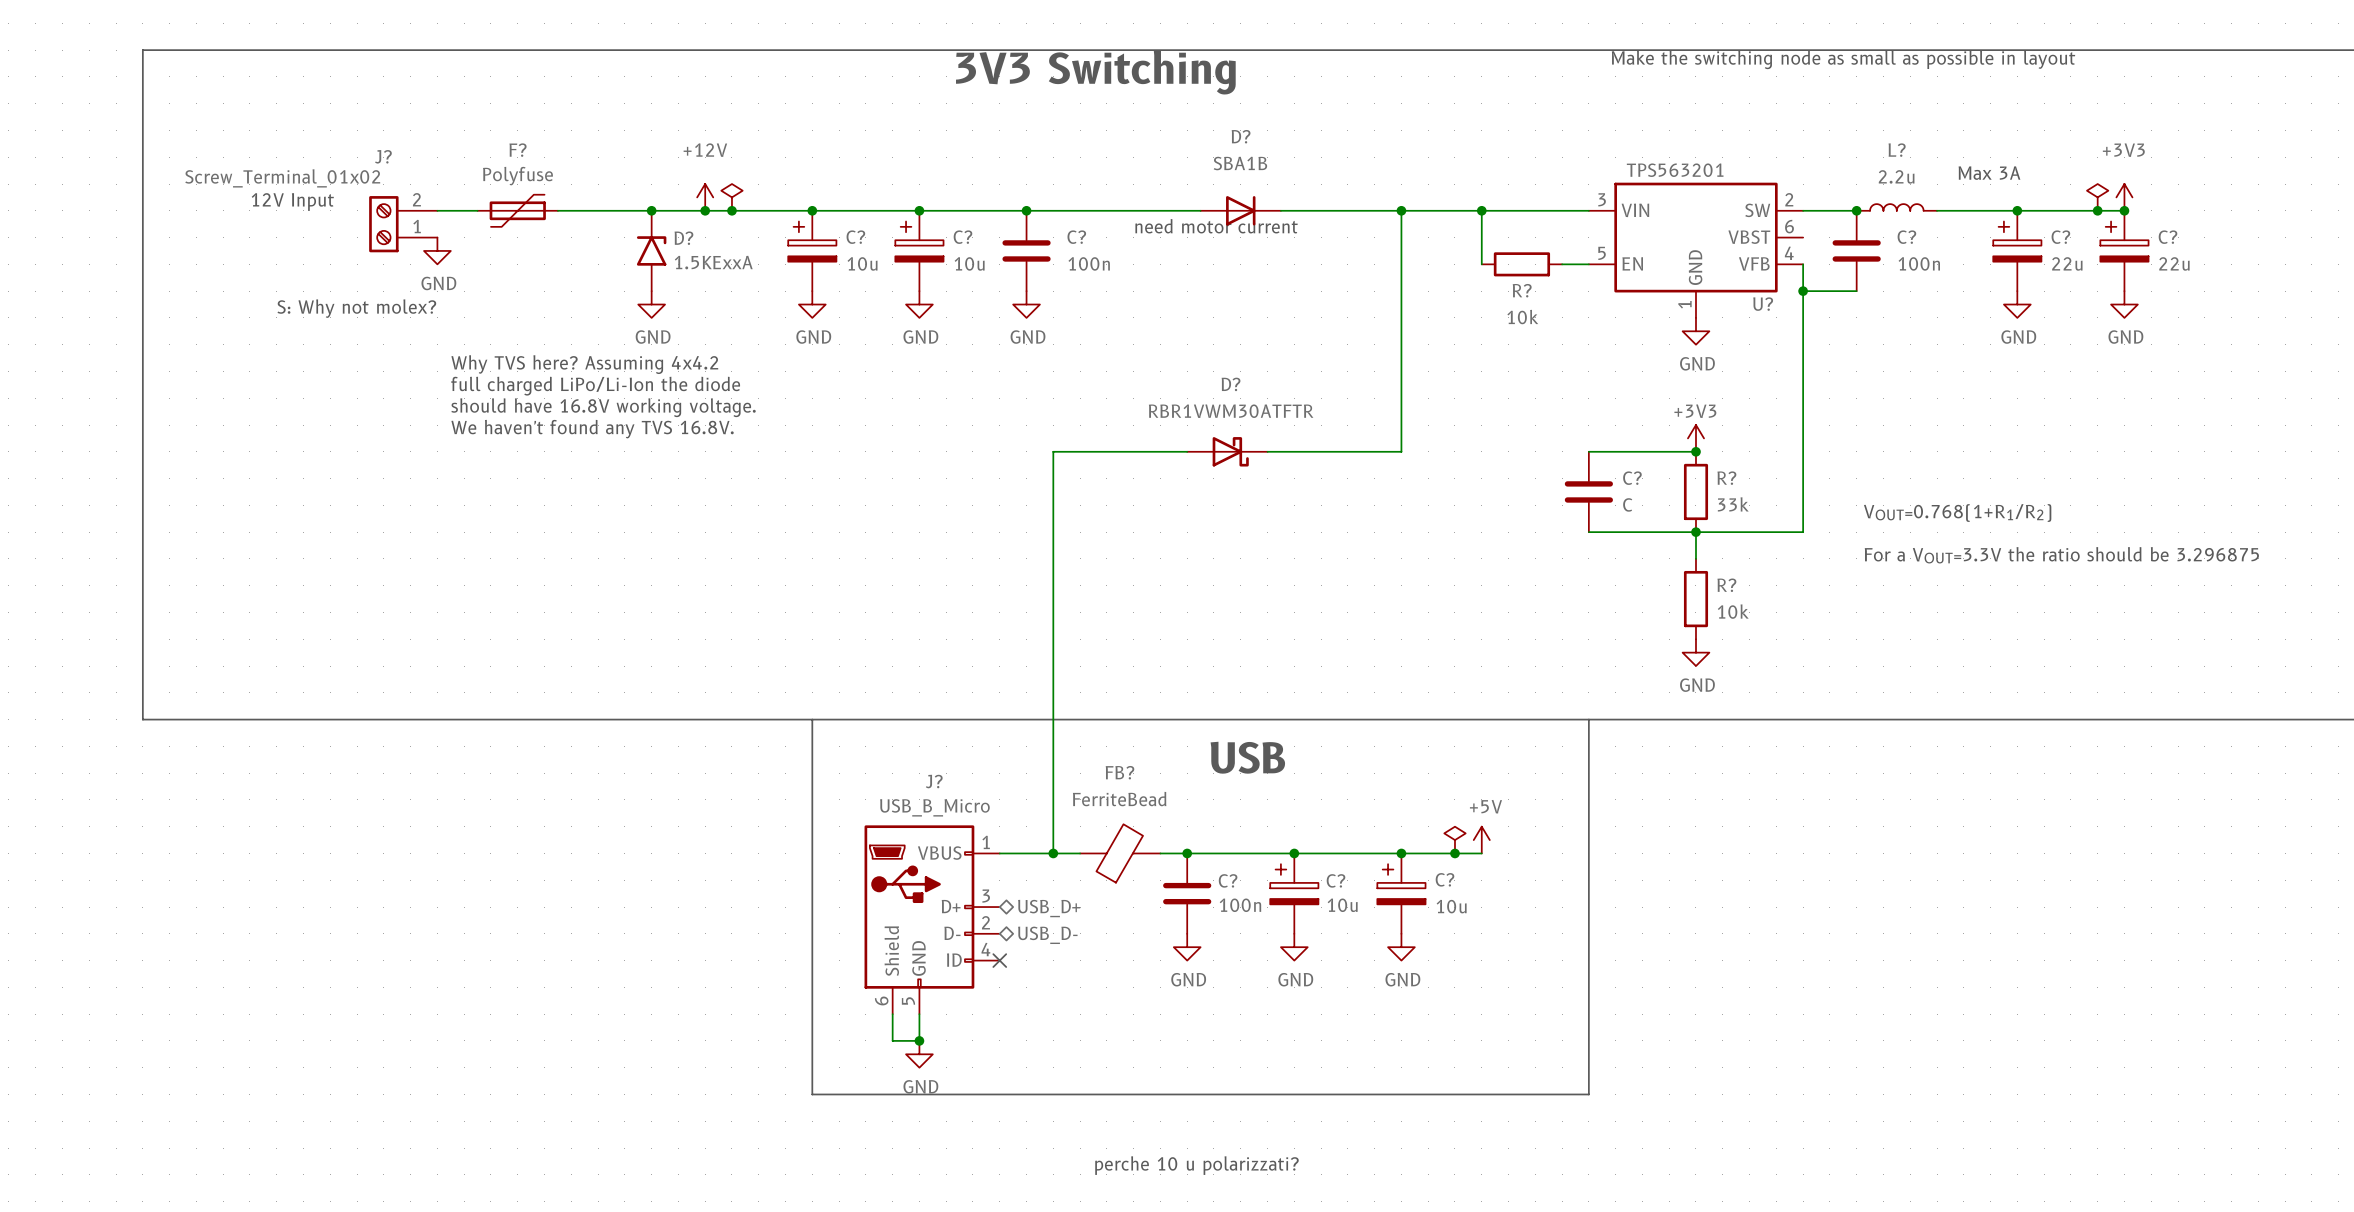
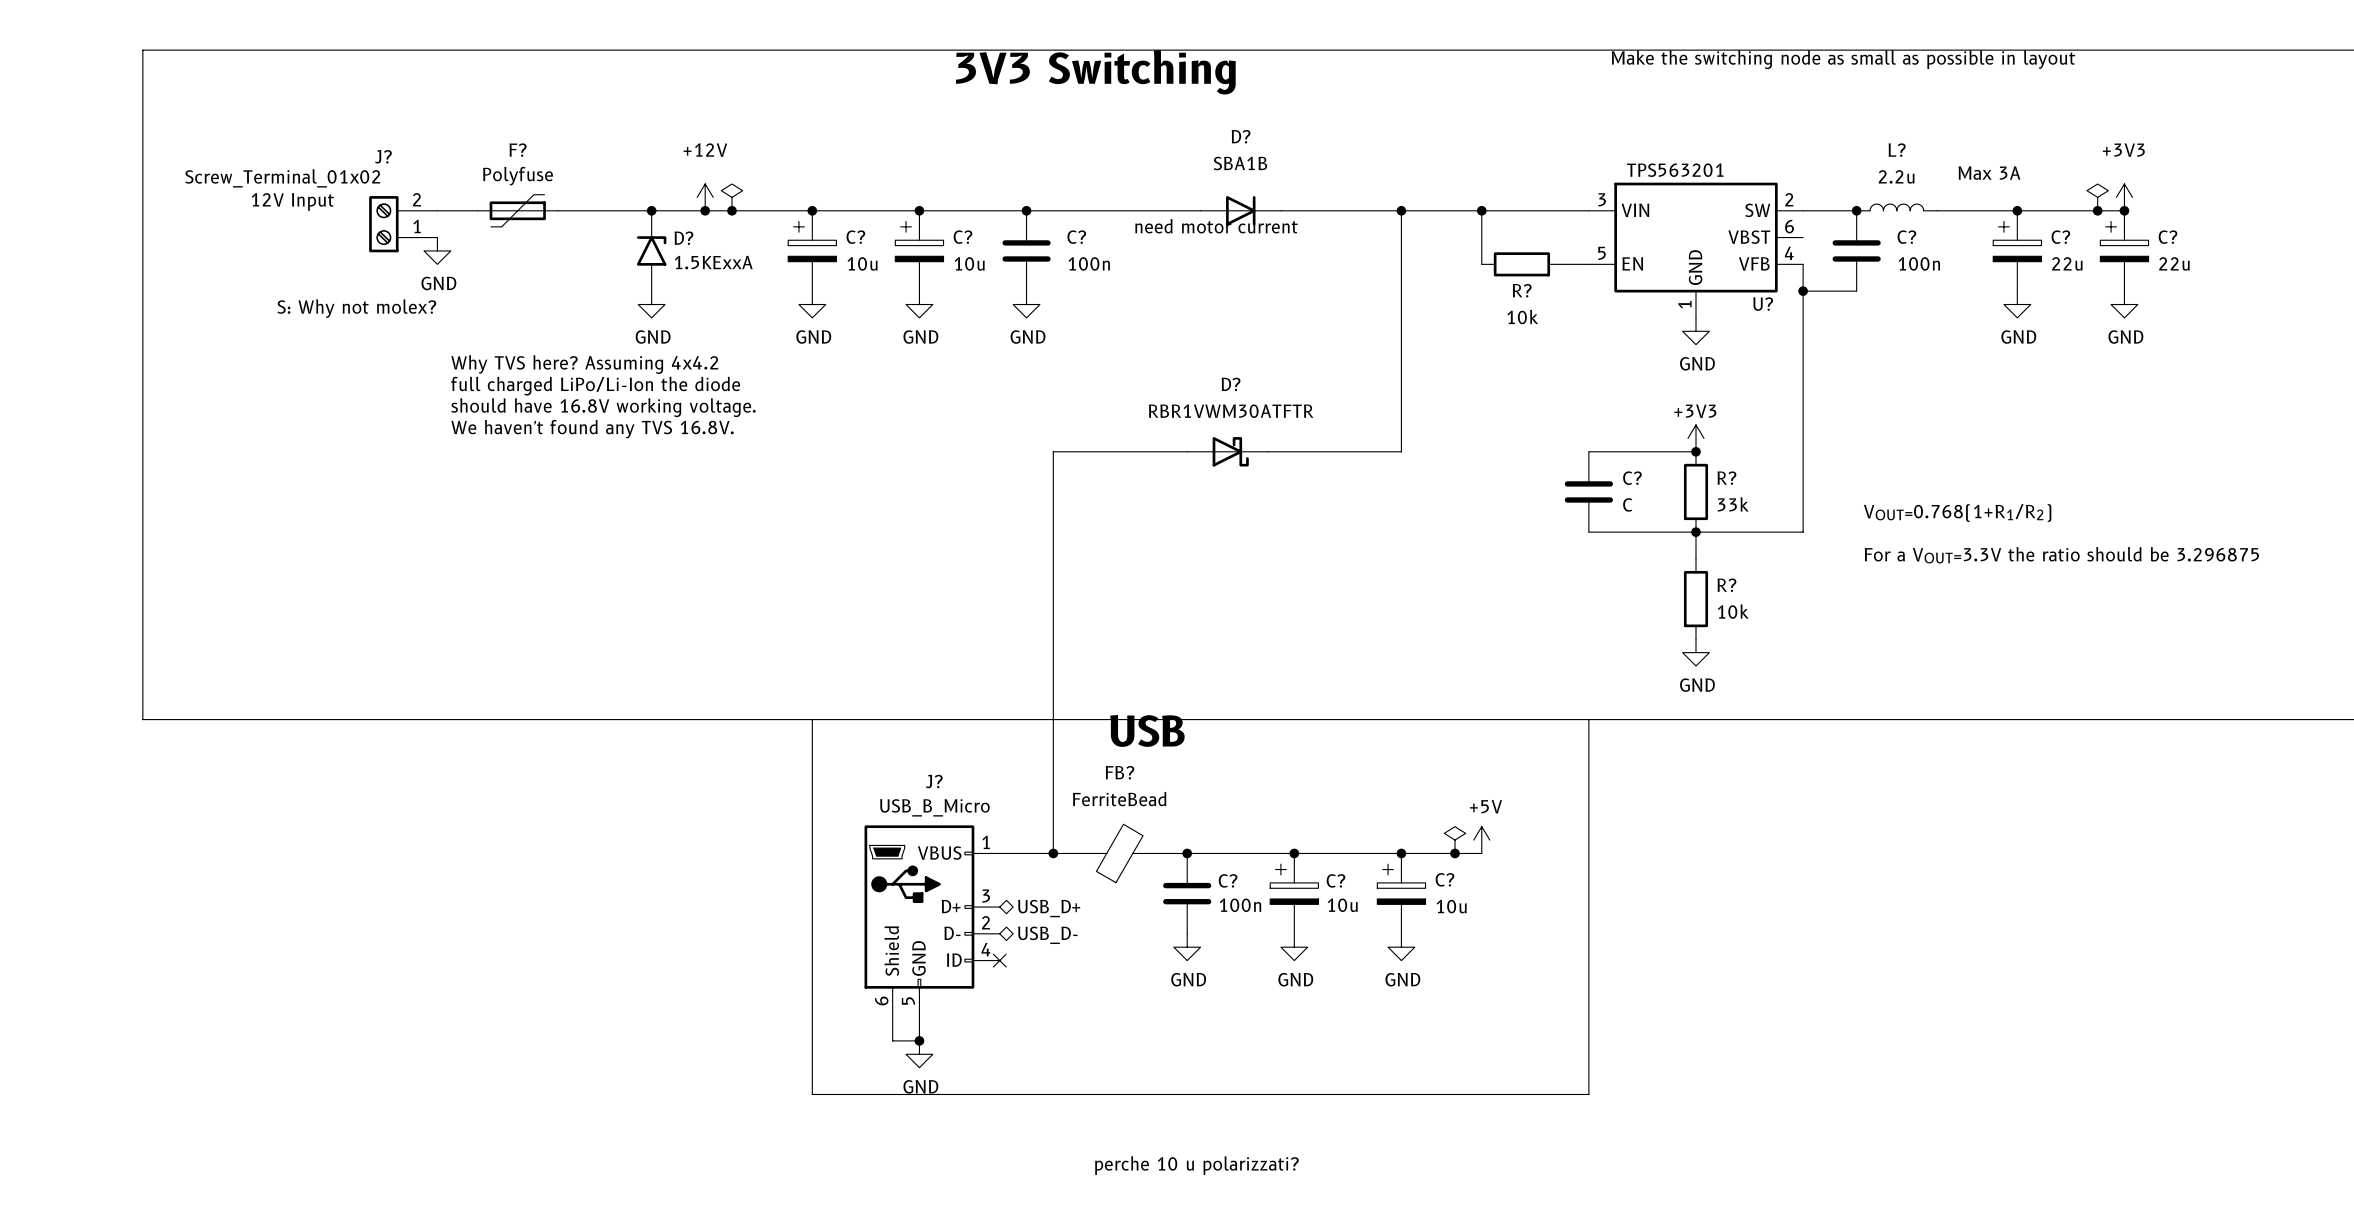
text position: USB (1247, 757) -> USB (1147, 730)

